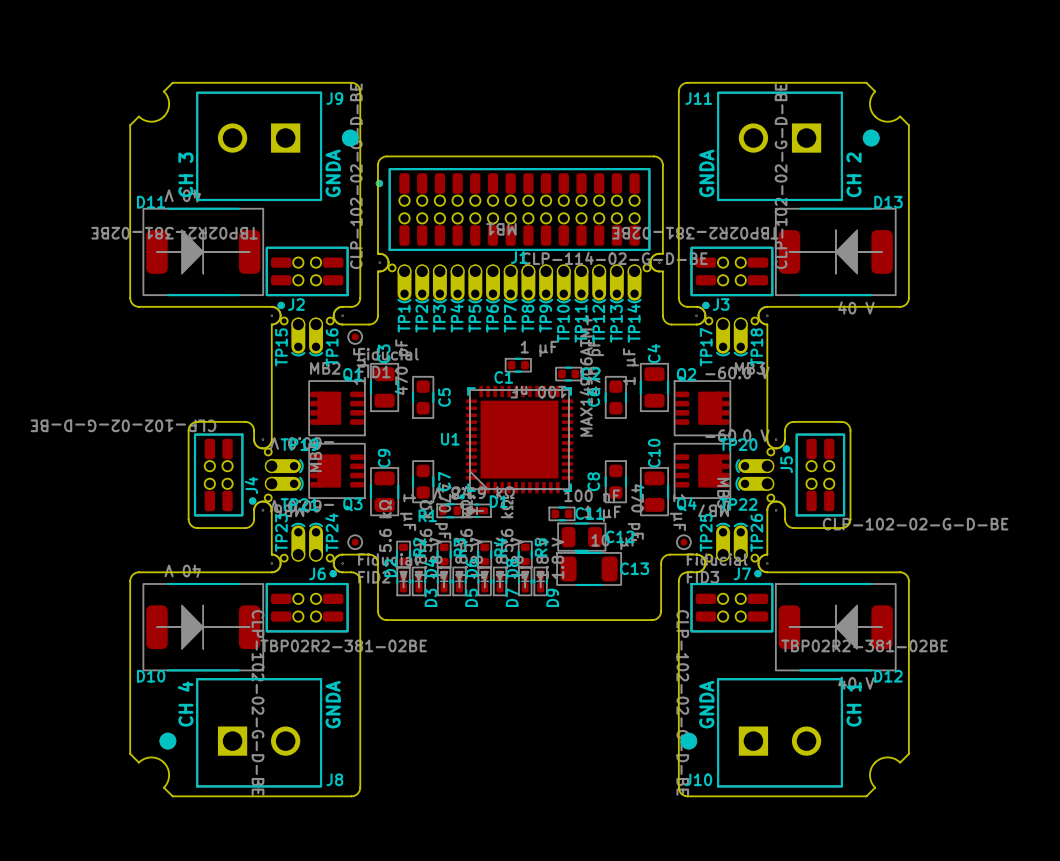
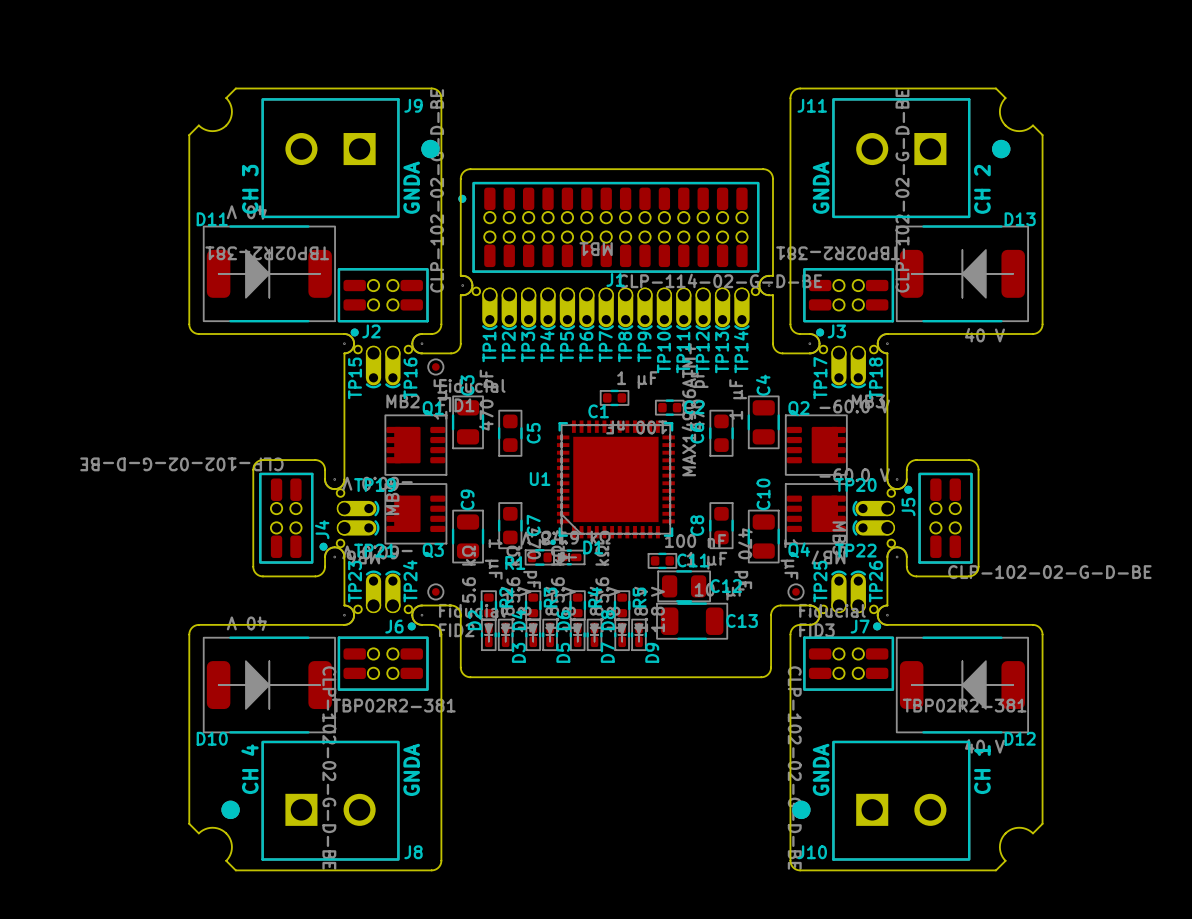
J9 value: TBP02R2-381-02BE (174, 233) -> TBP02R2-381 (267, 253)
J11 value: TBP02R2-381-02BE (695, 233) -> TBP02R2-381 (837, 253)
J8 value: TBP02R2-381-02BE (343, 645) -> TBP02R2-381 (393, 705)
J10 value: TBP02R2-381-02BE (864, 645) -> TBP02R2-381 (964, 705)

